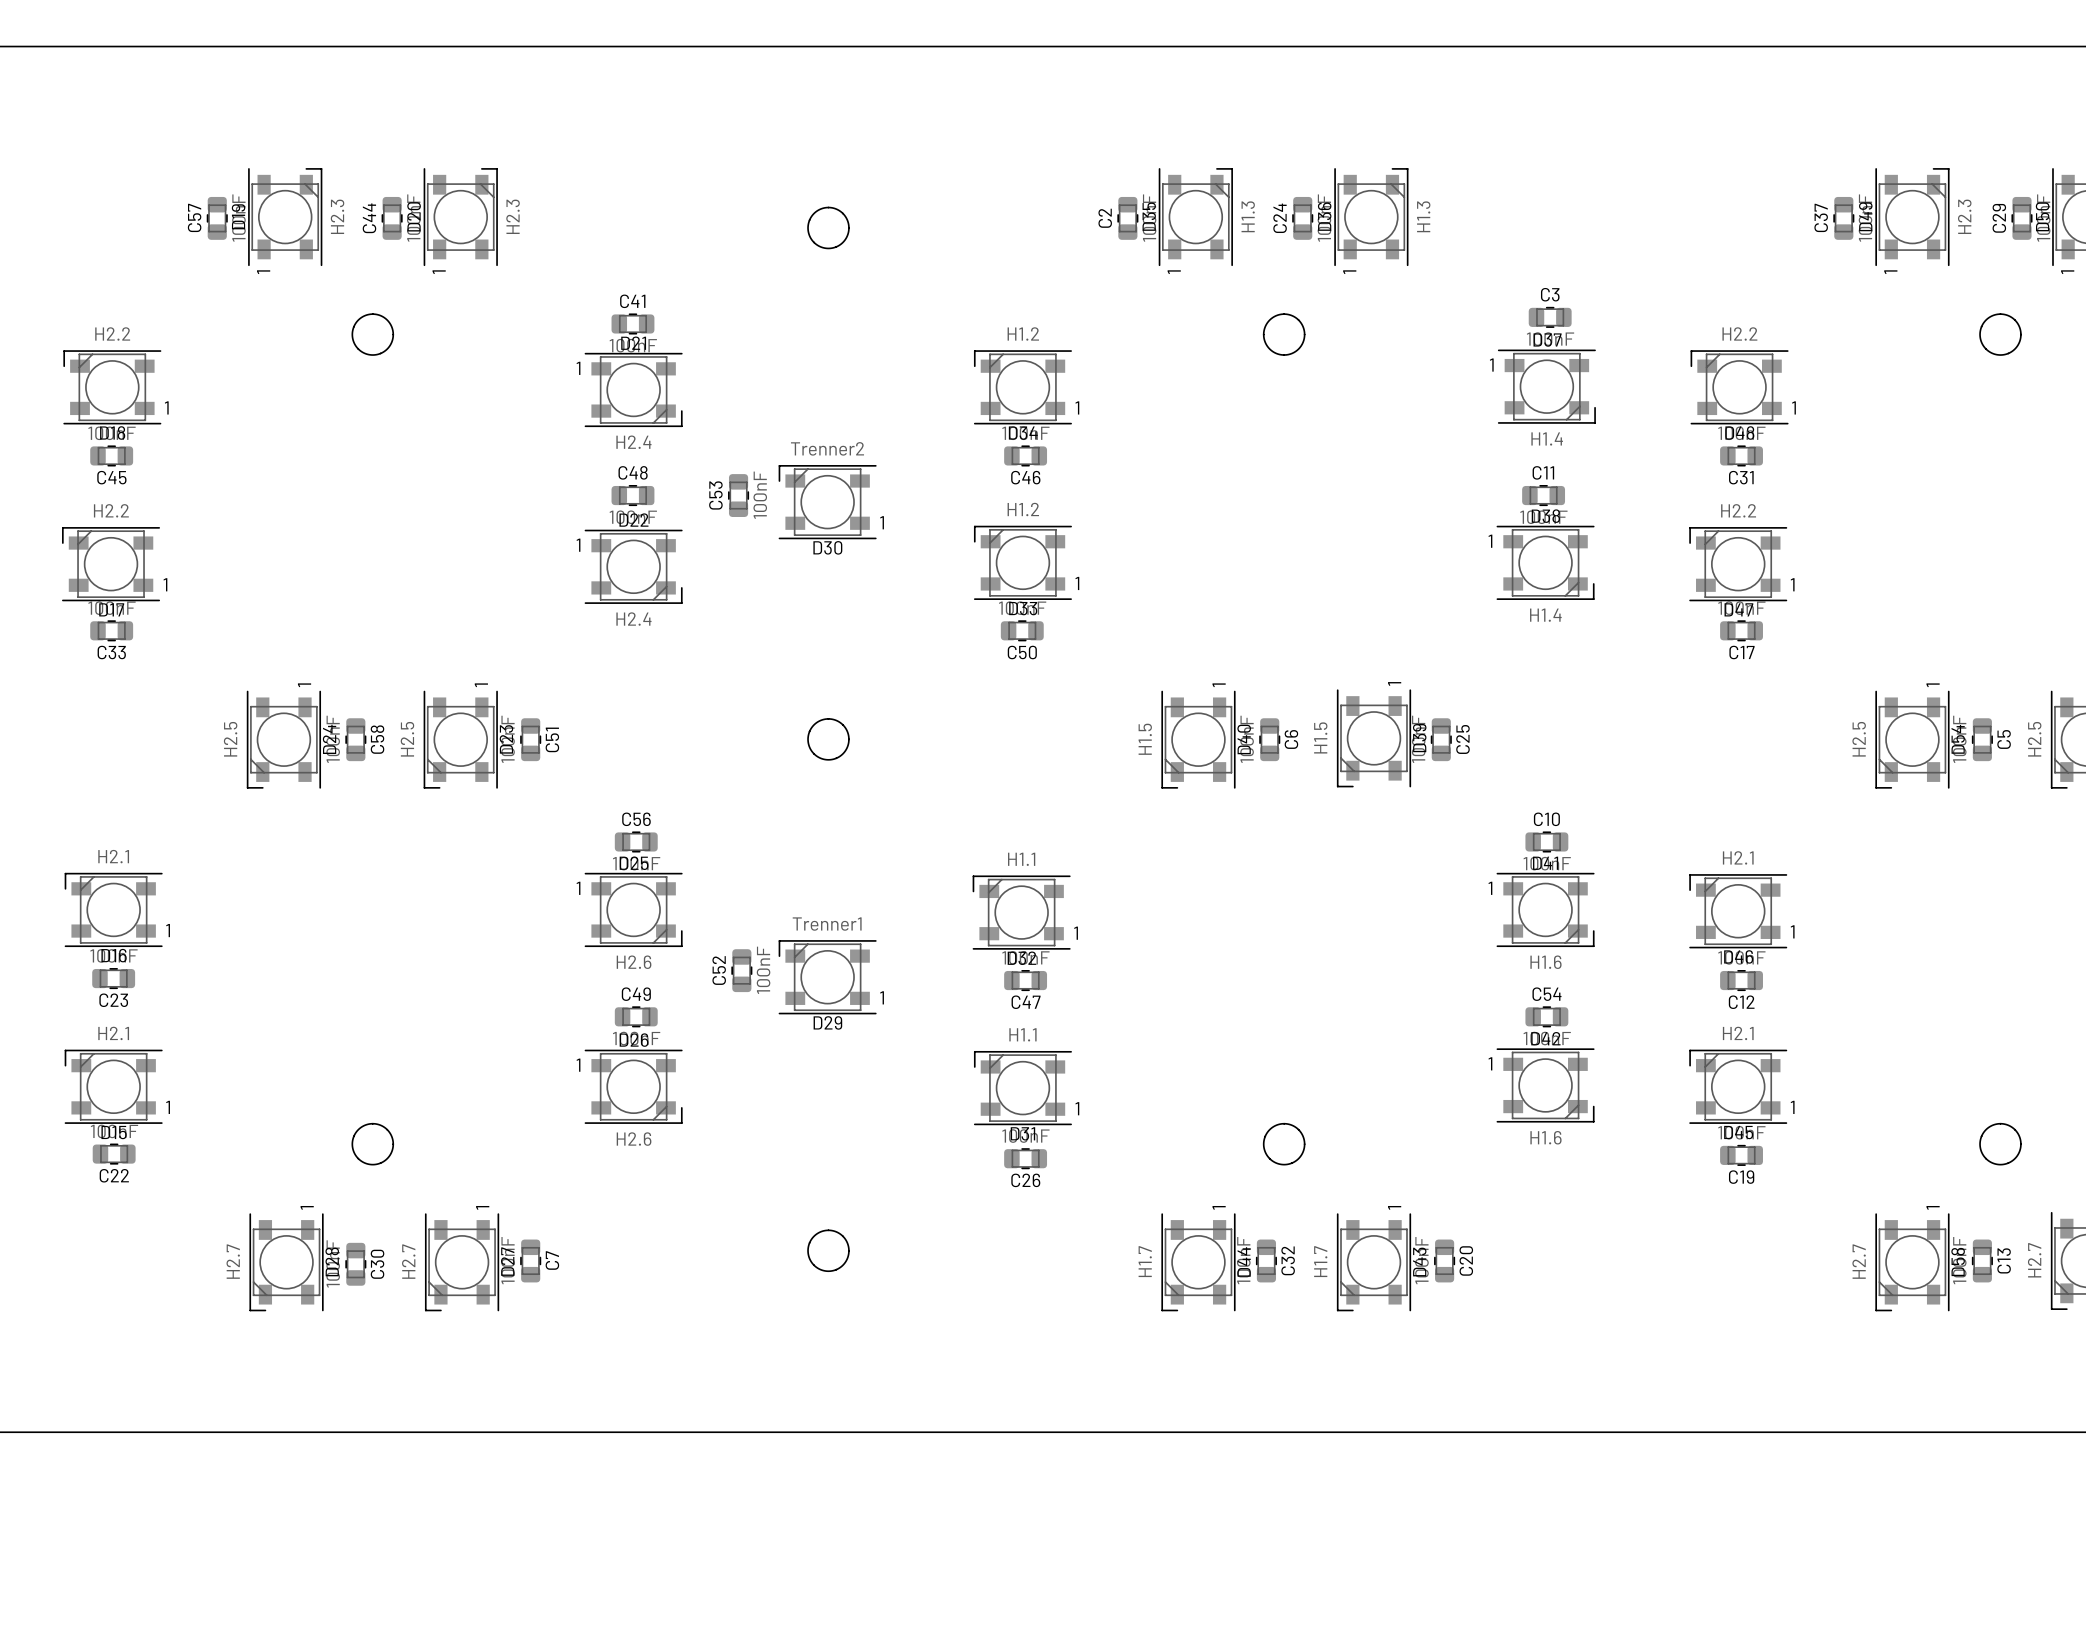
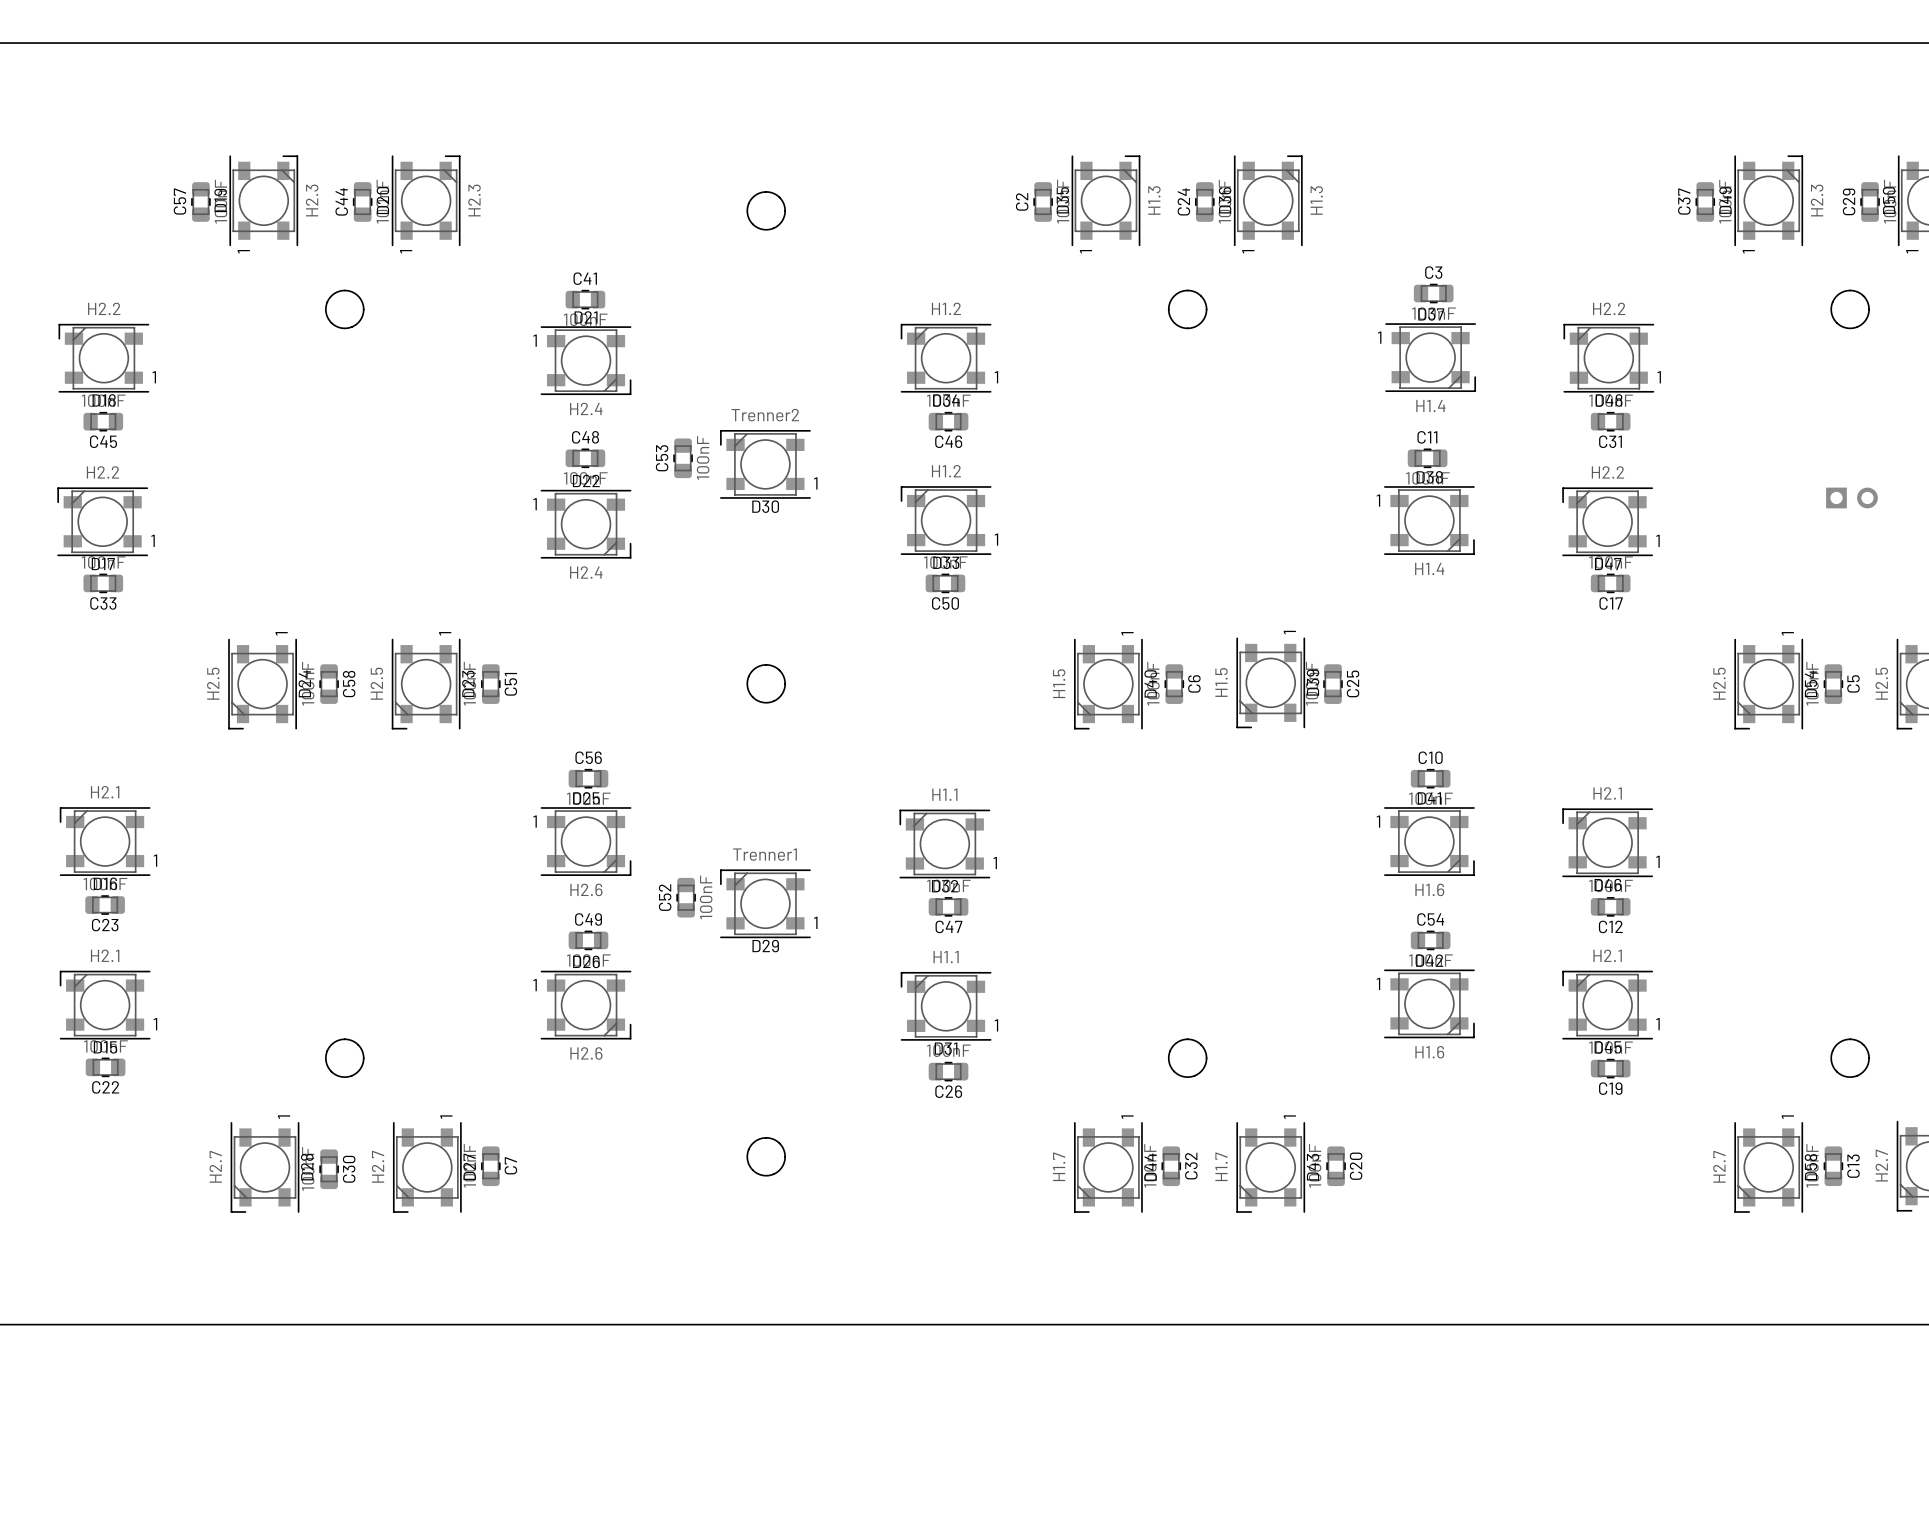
part: none -> (1851, 497)

